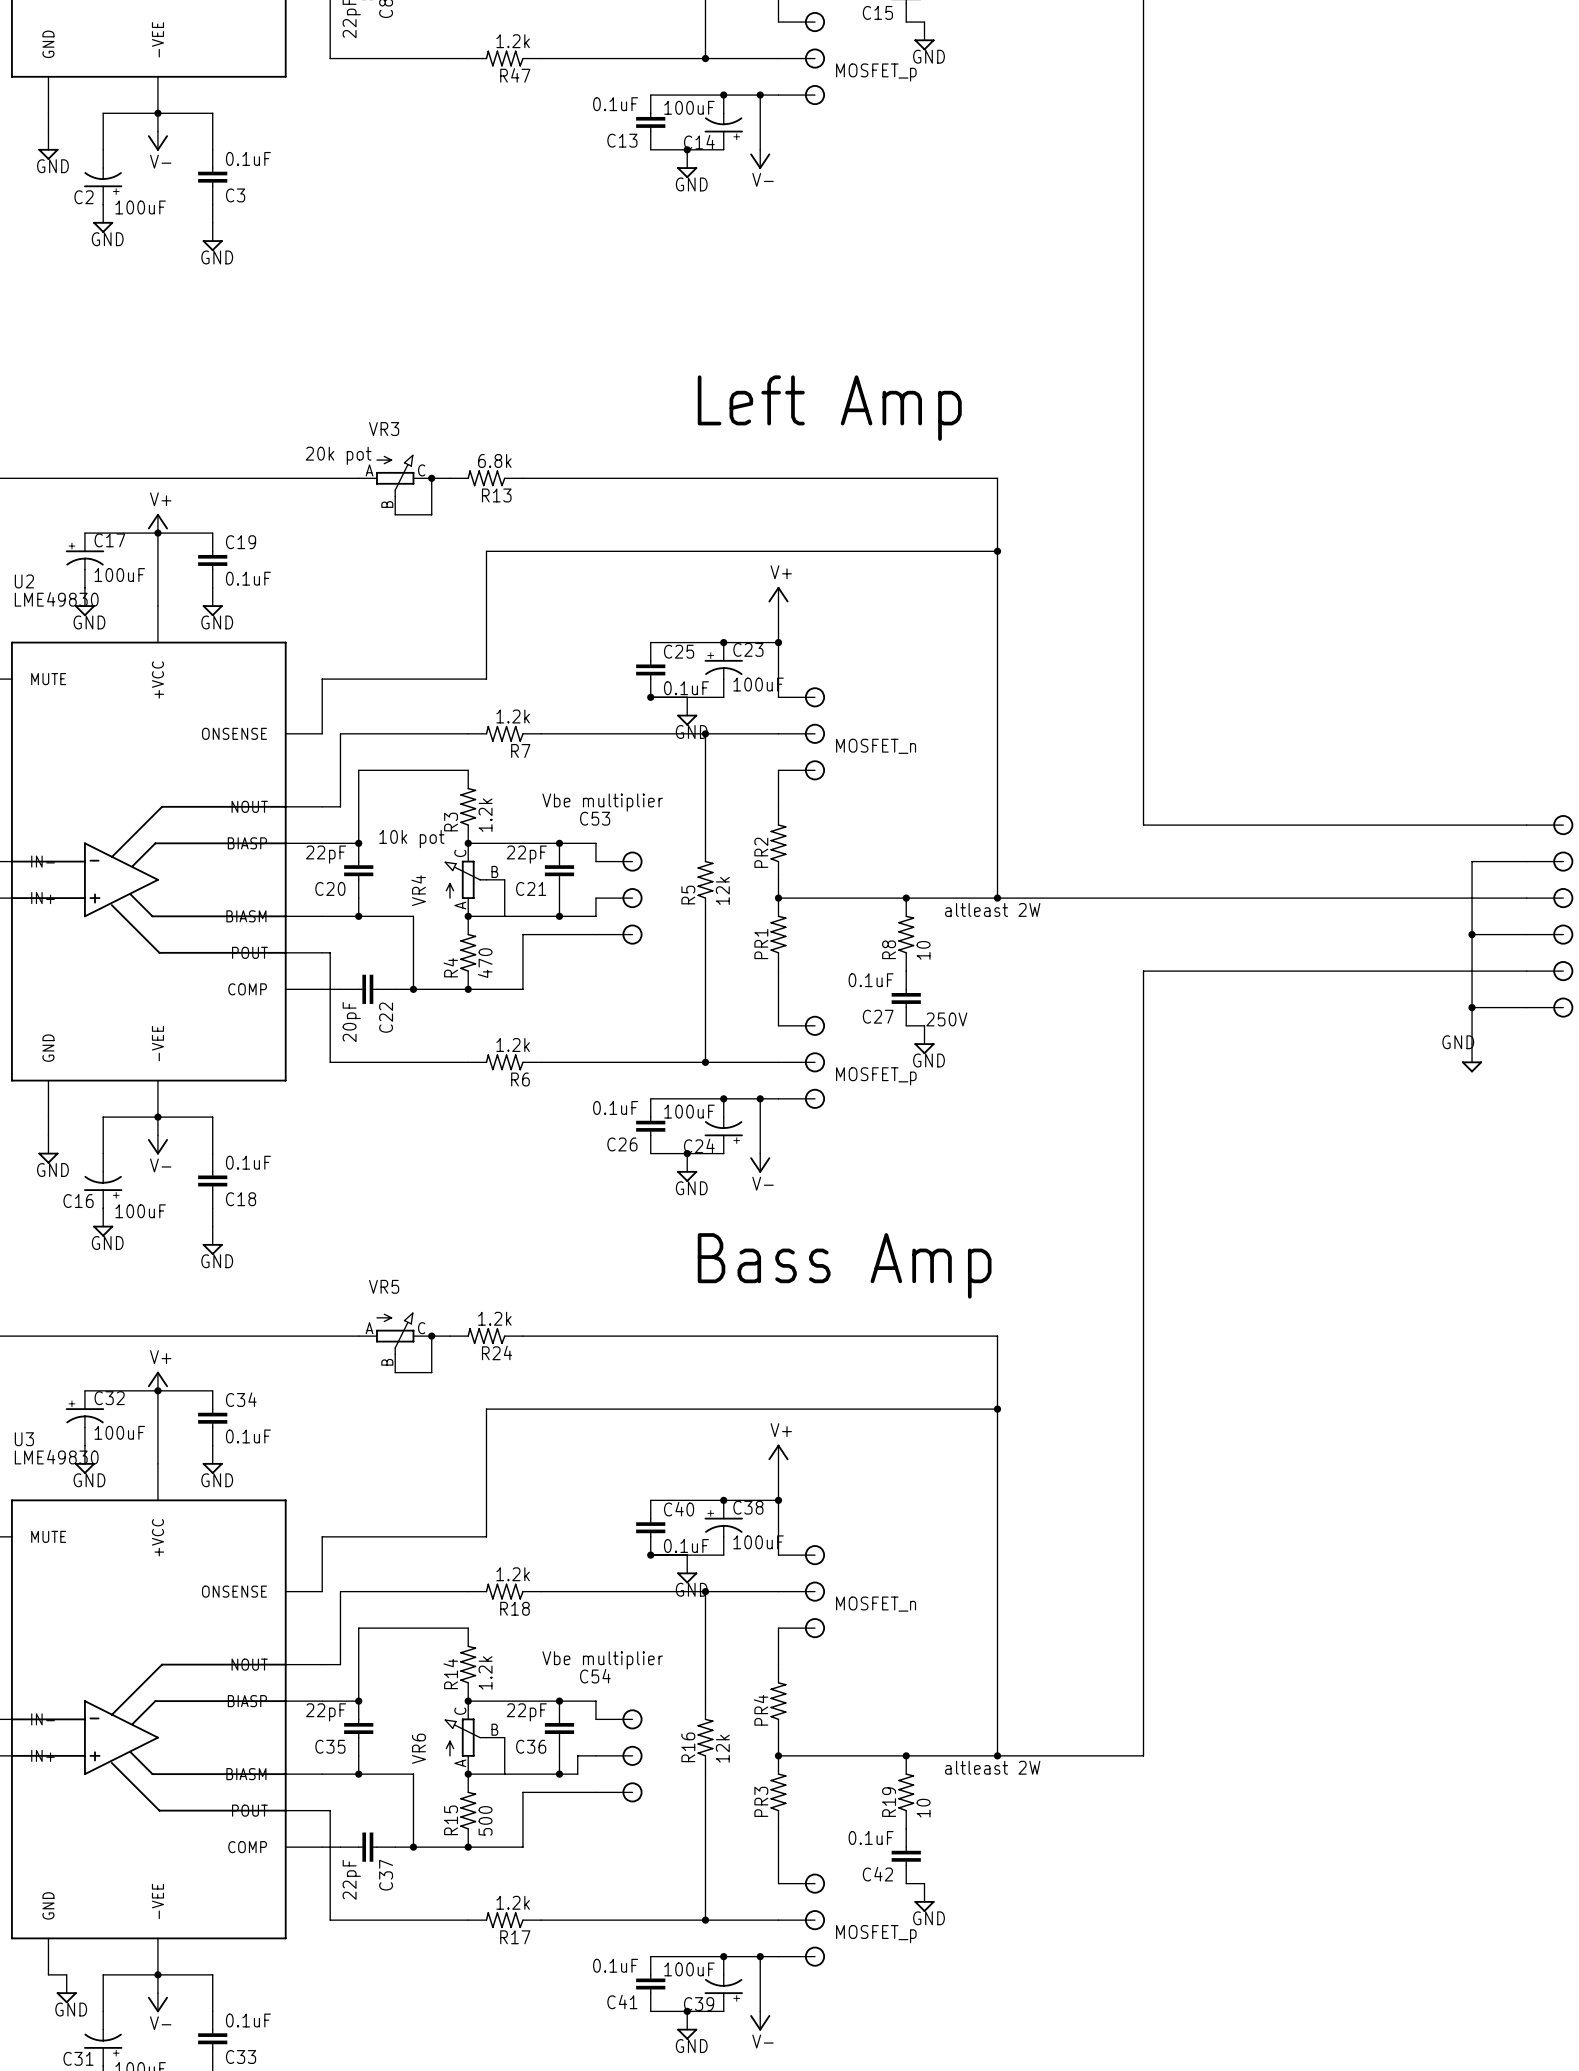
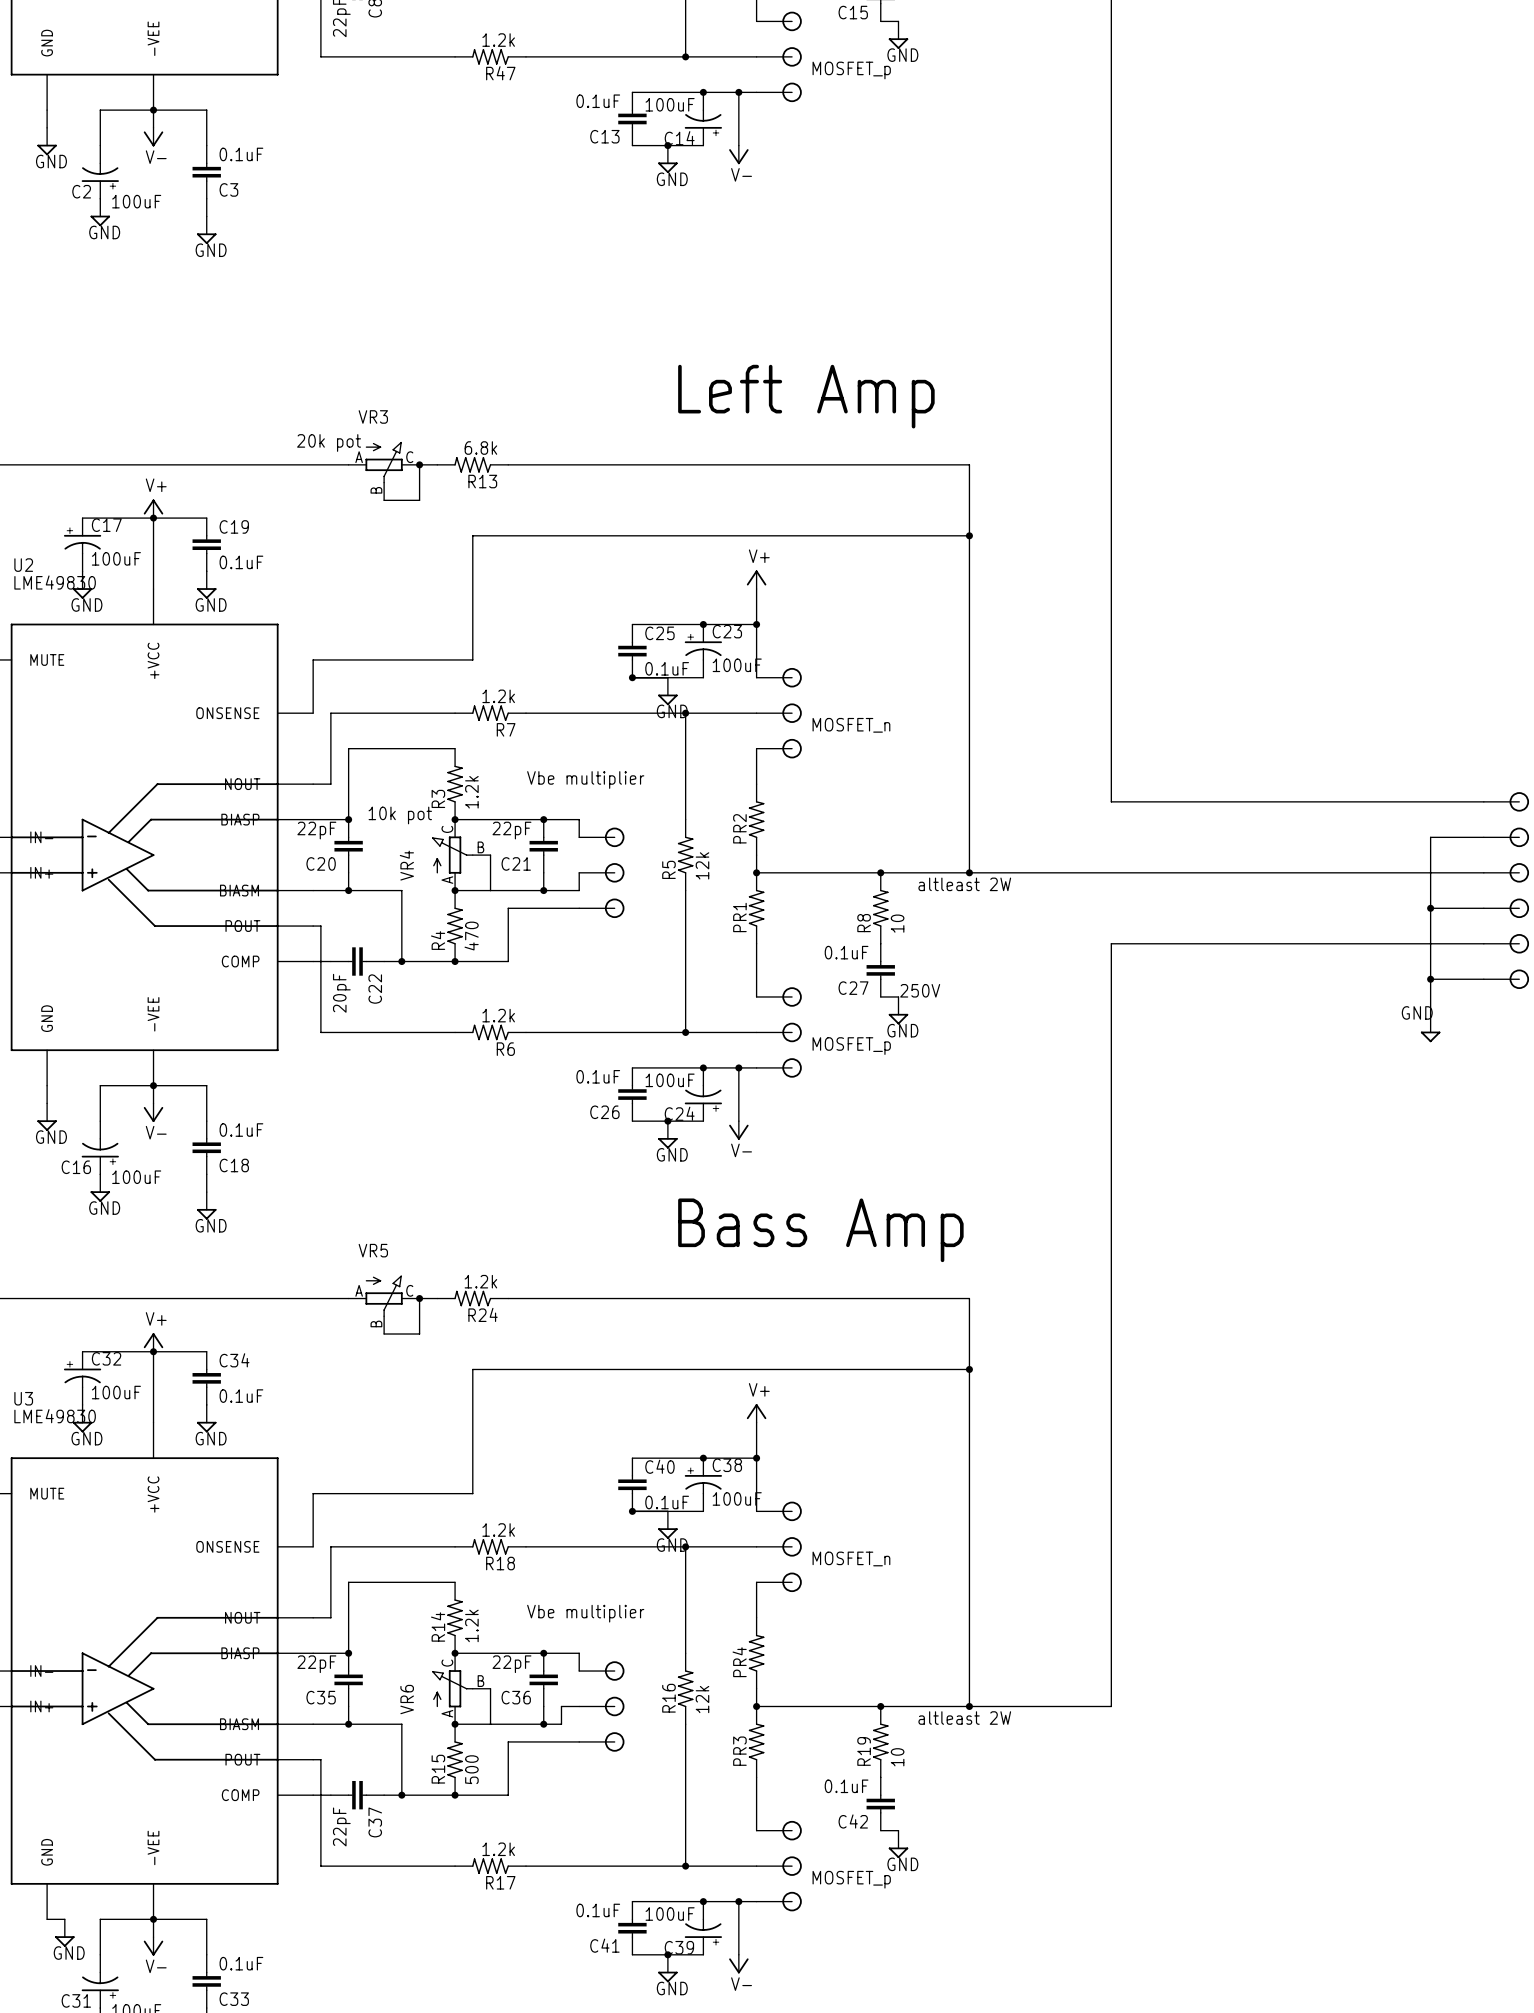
C53 name: C53 (595, 818) -> none
C54 name: C54 (595, 1676) -> none

